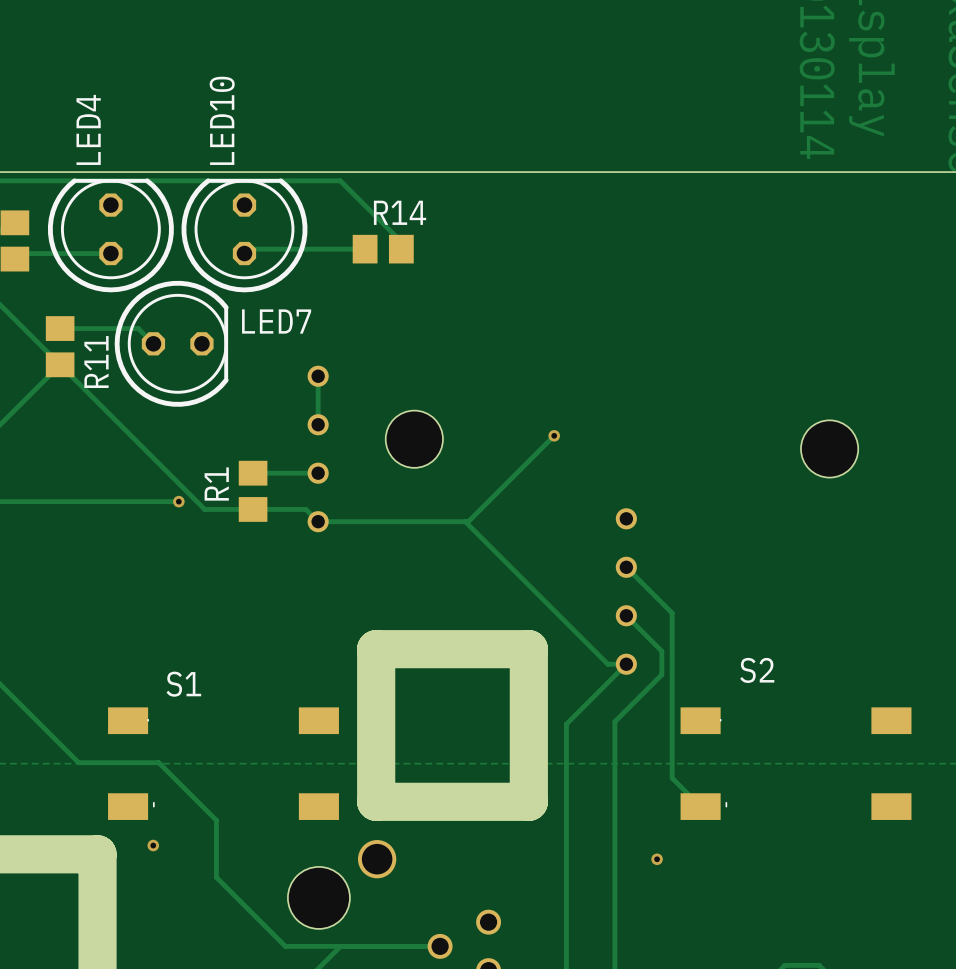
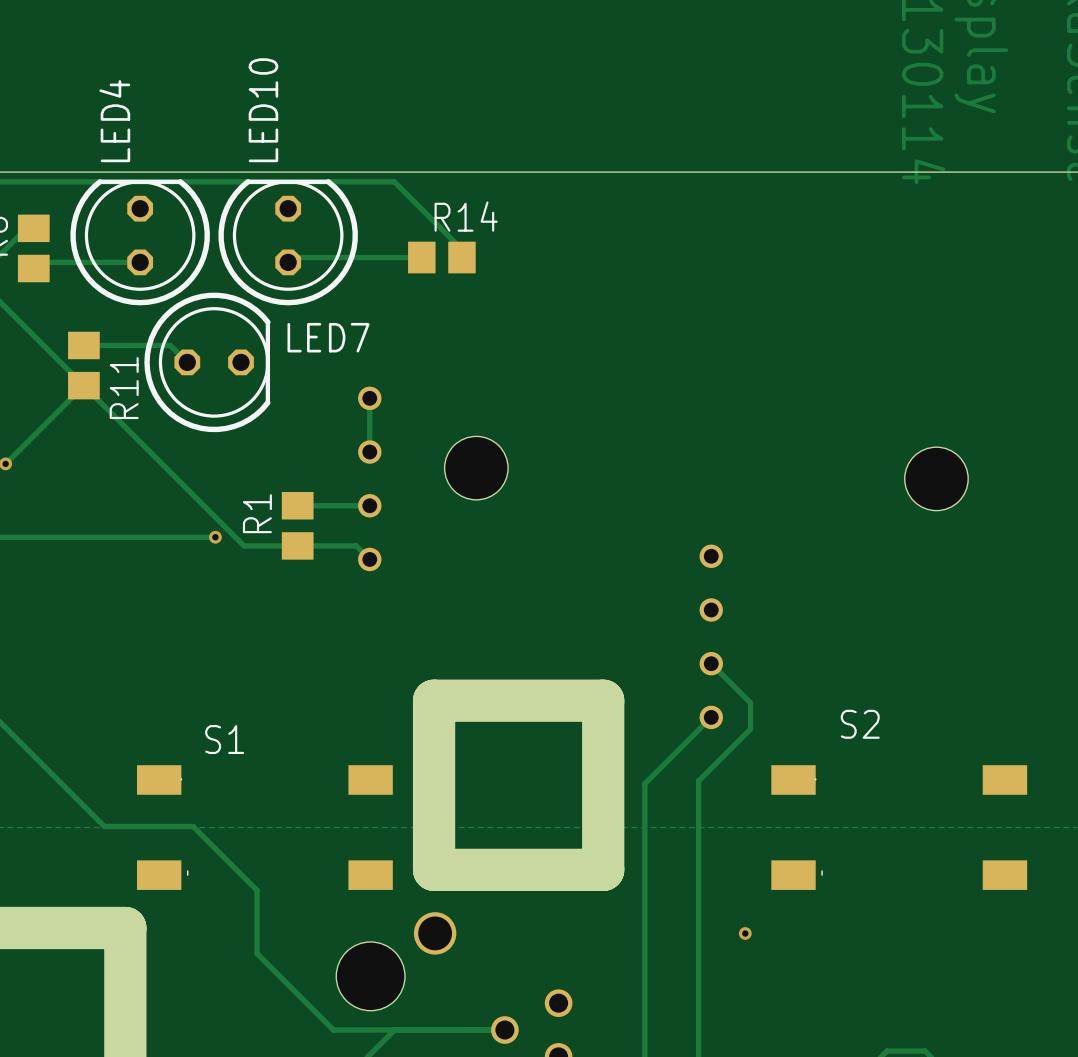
track: (554, 435) (468, 521) (318, 521) -> none
via: (554, 435) -> none
track: (465, 521) (607, 664) (626, 664) -> none
track: (626, 567) (672, 613) (672, 778) (700, 806) -> none
via: (153, 845) -> none

